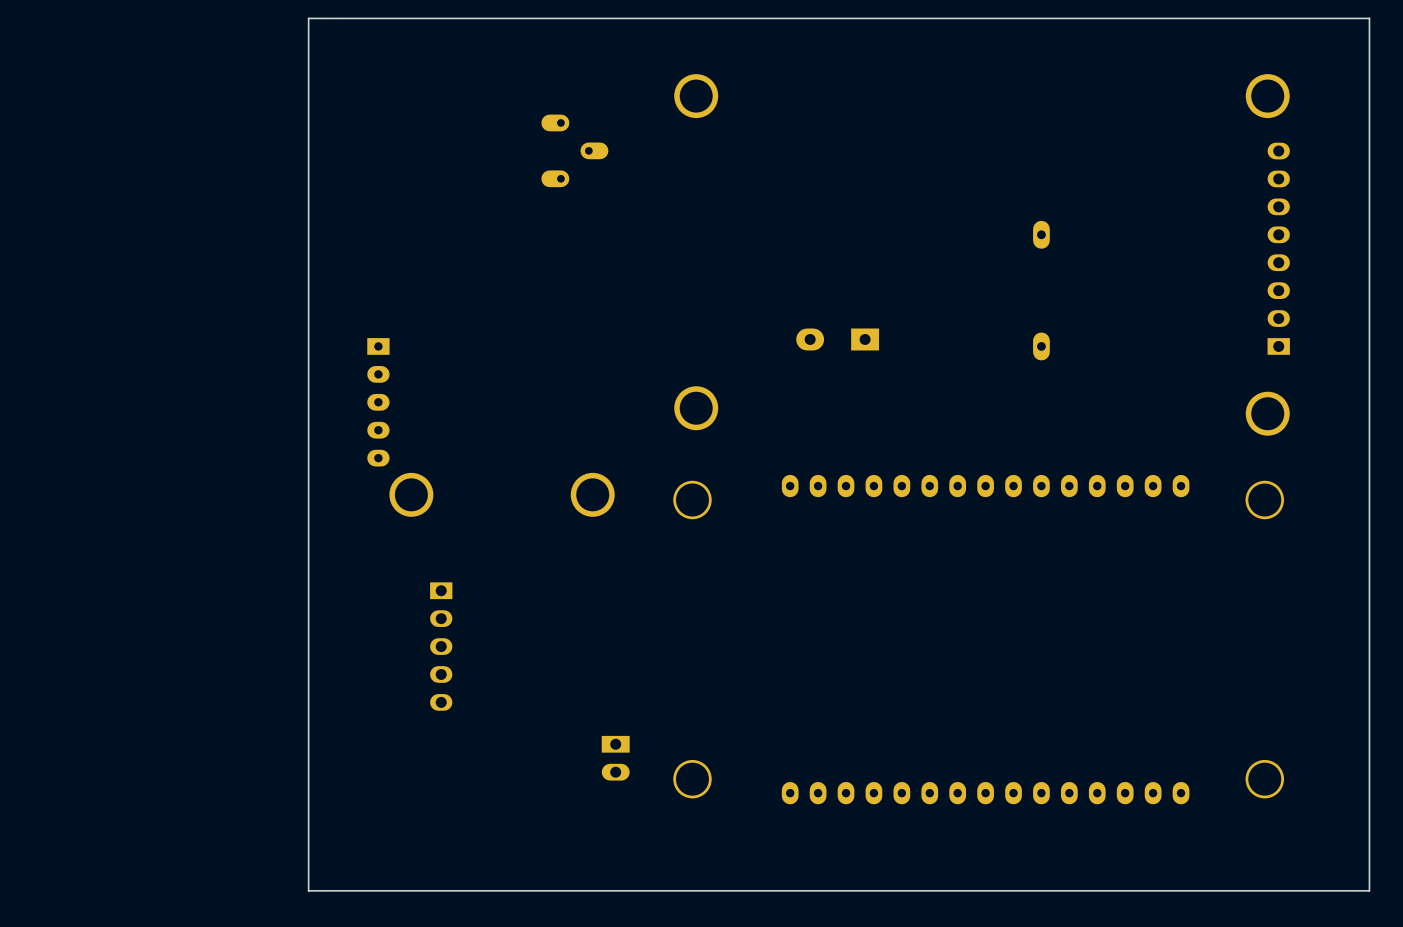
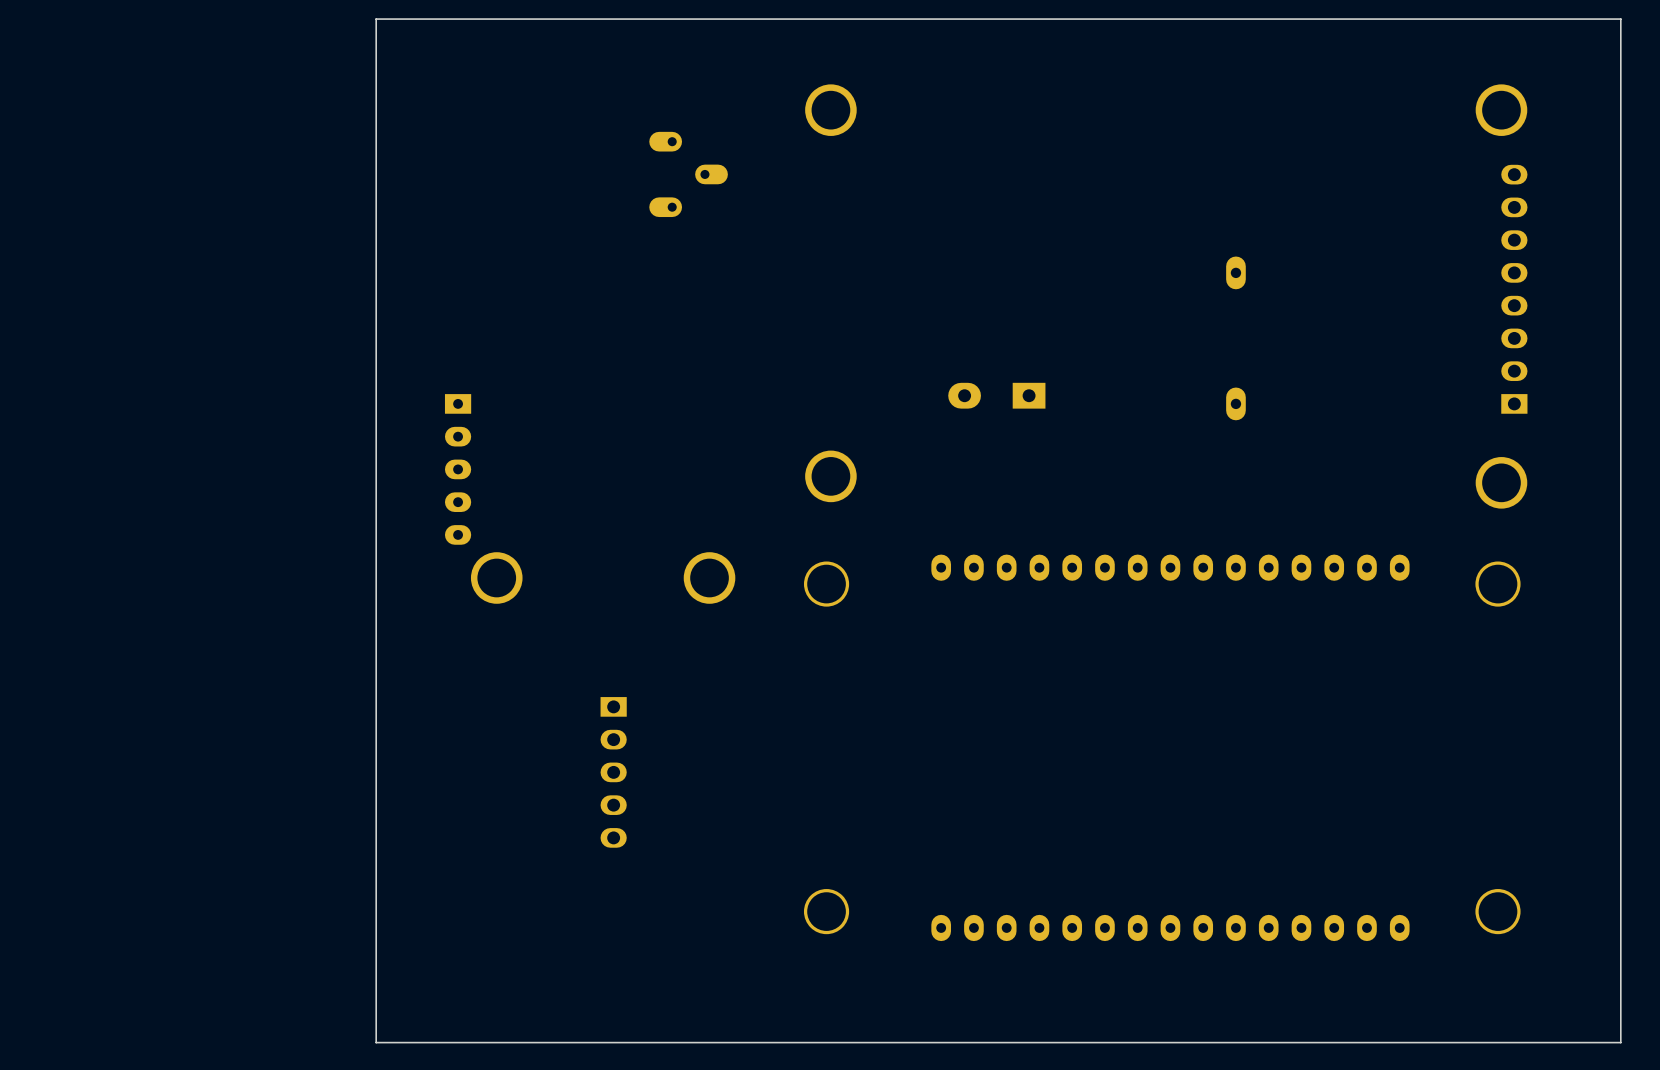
part position: (441, 646) -> (613, 772)
part: (615, 758) -> none

